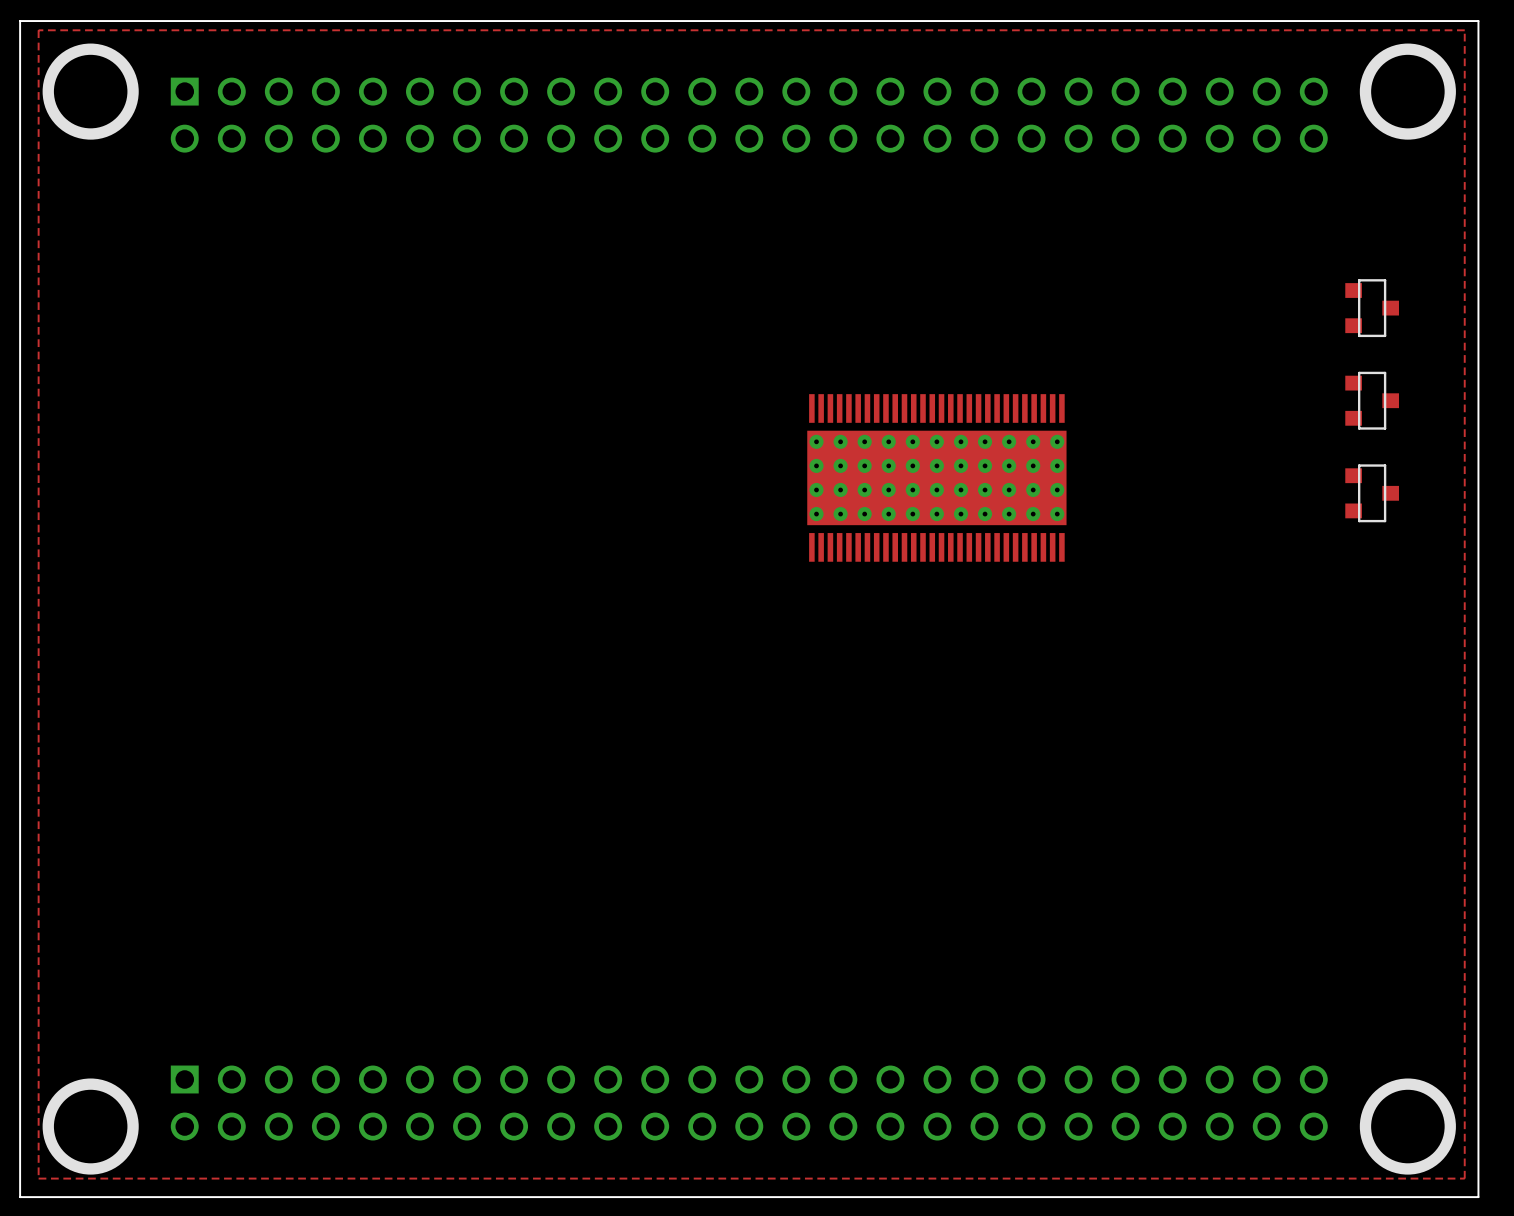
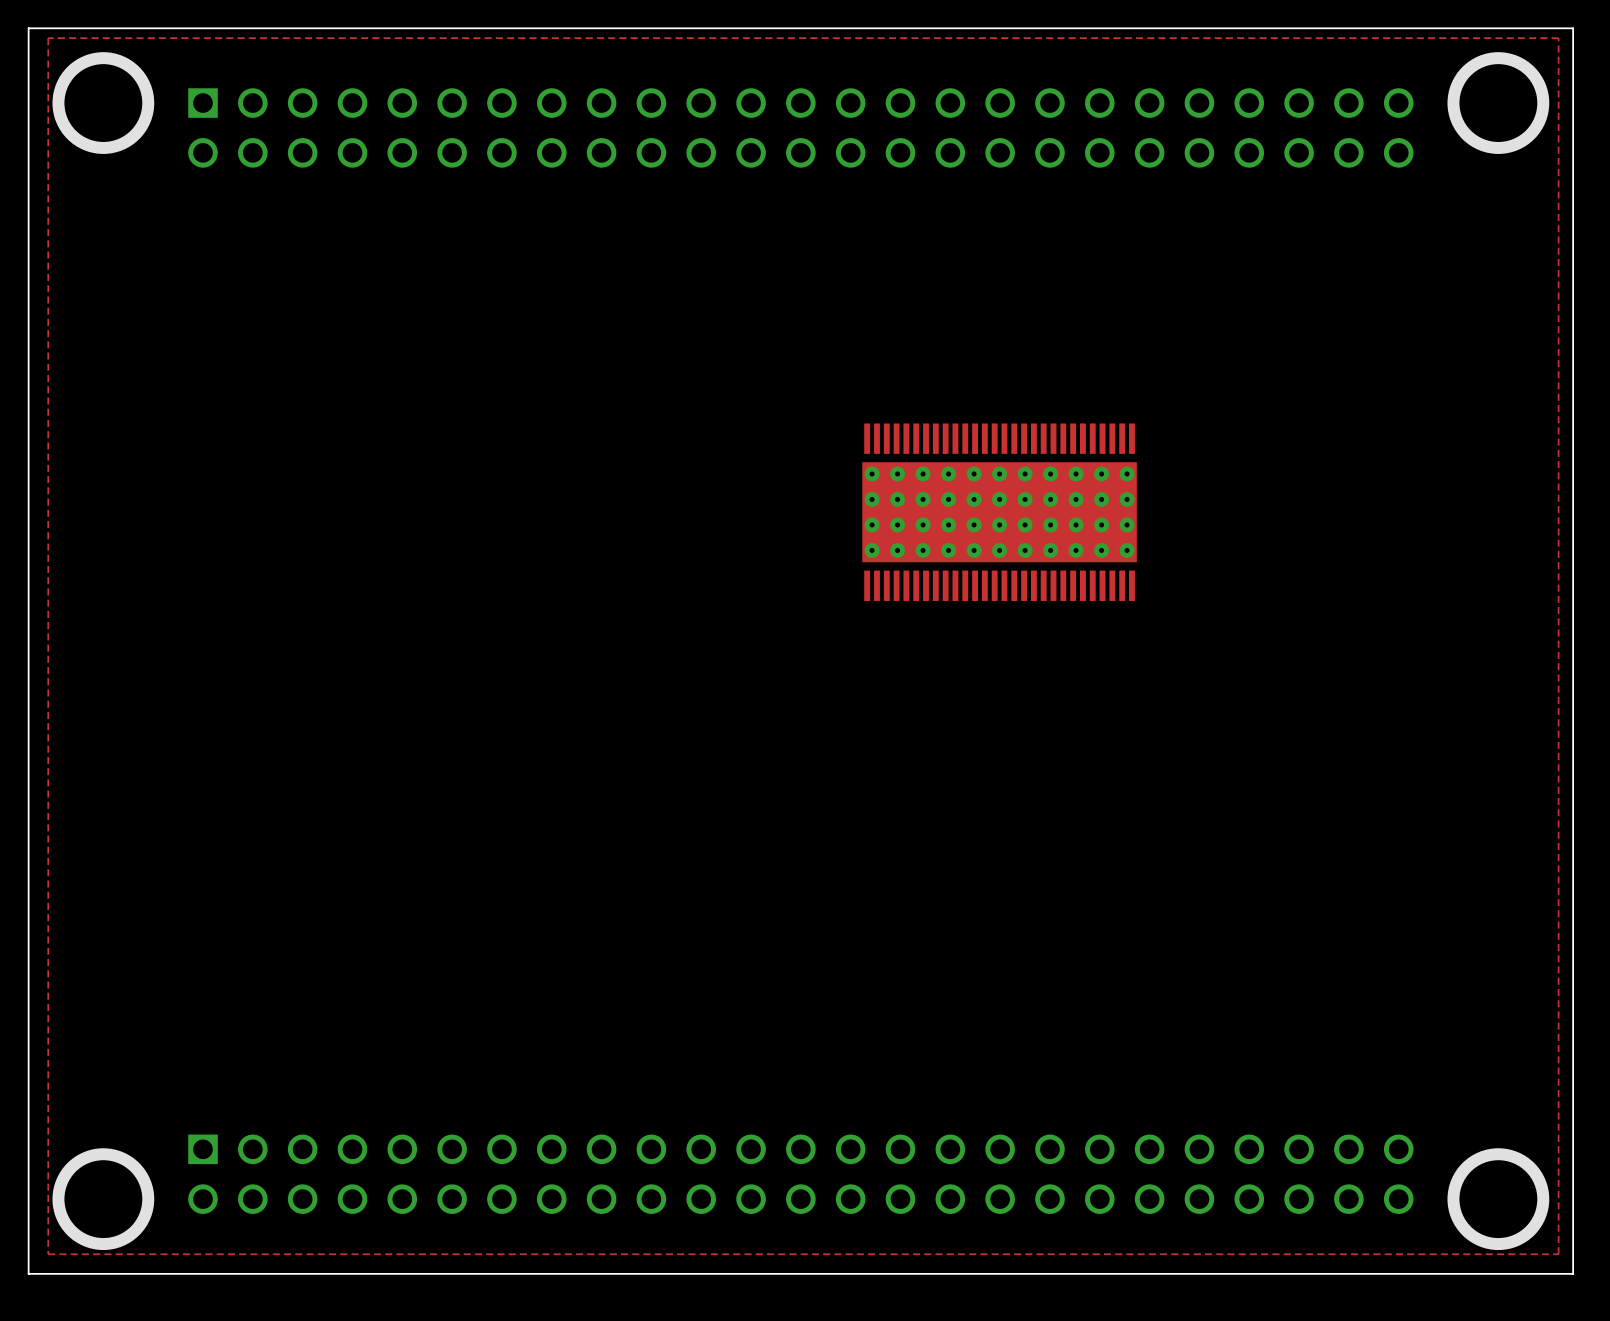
part: (1372, 308) -> none
part: (1372, 400) -> none
part: (1372, 493) -> none

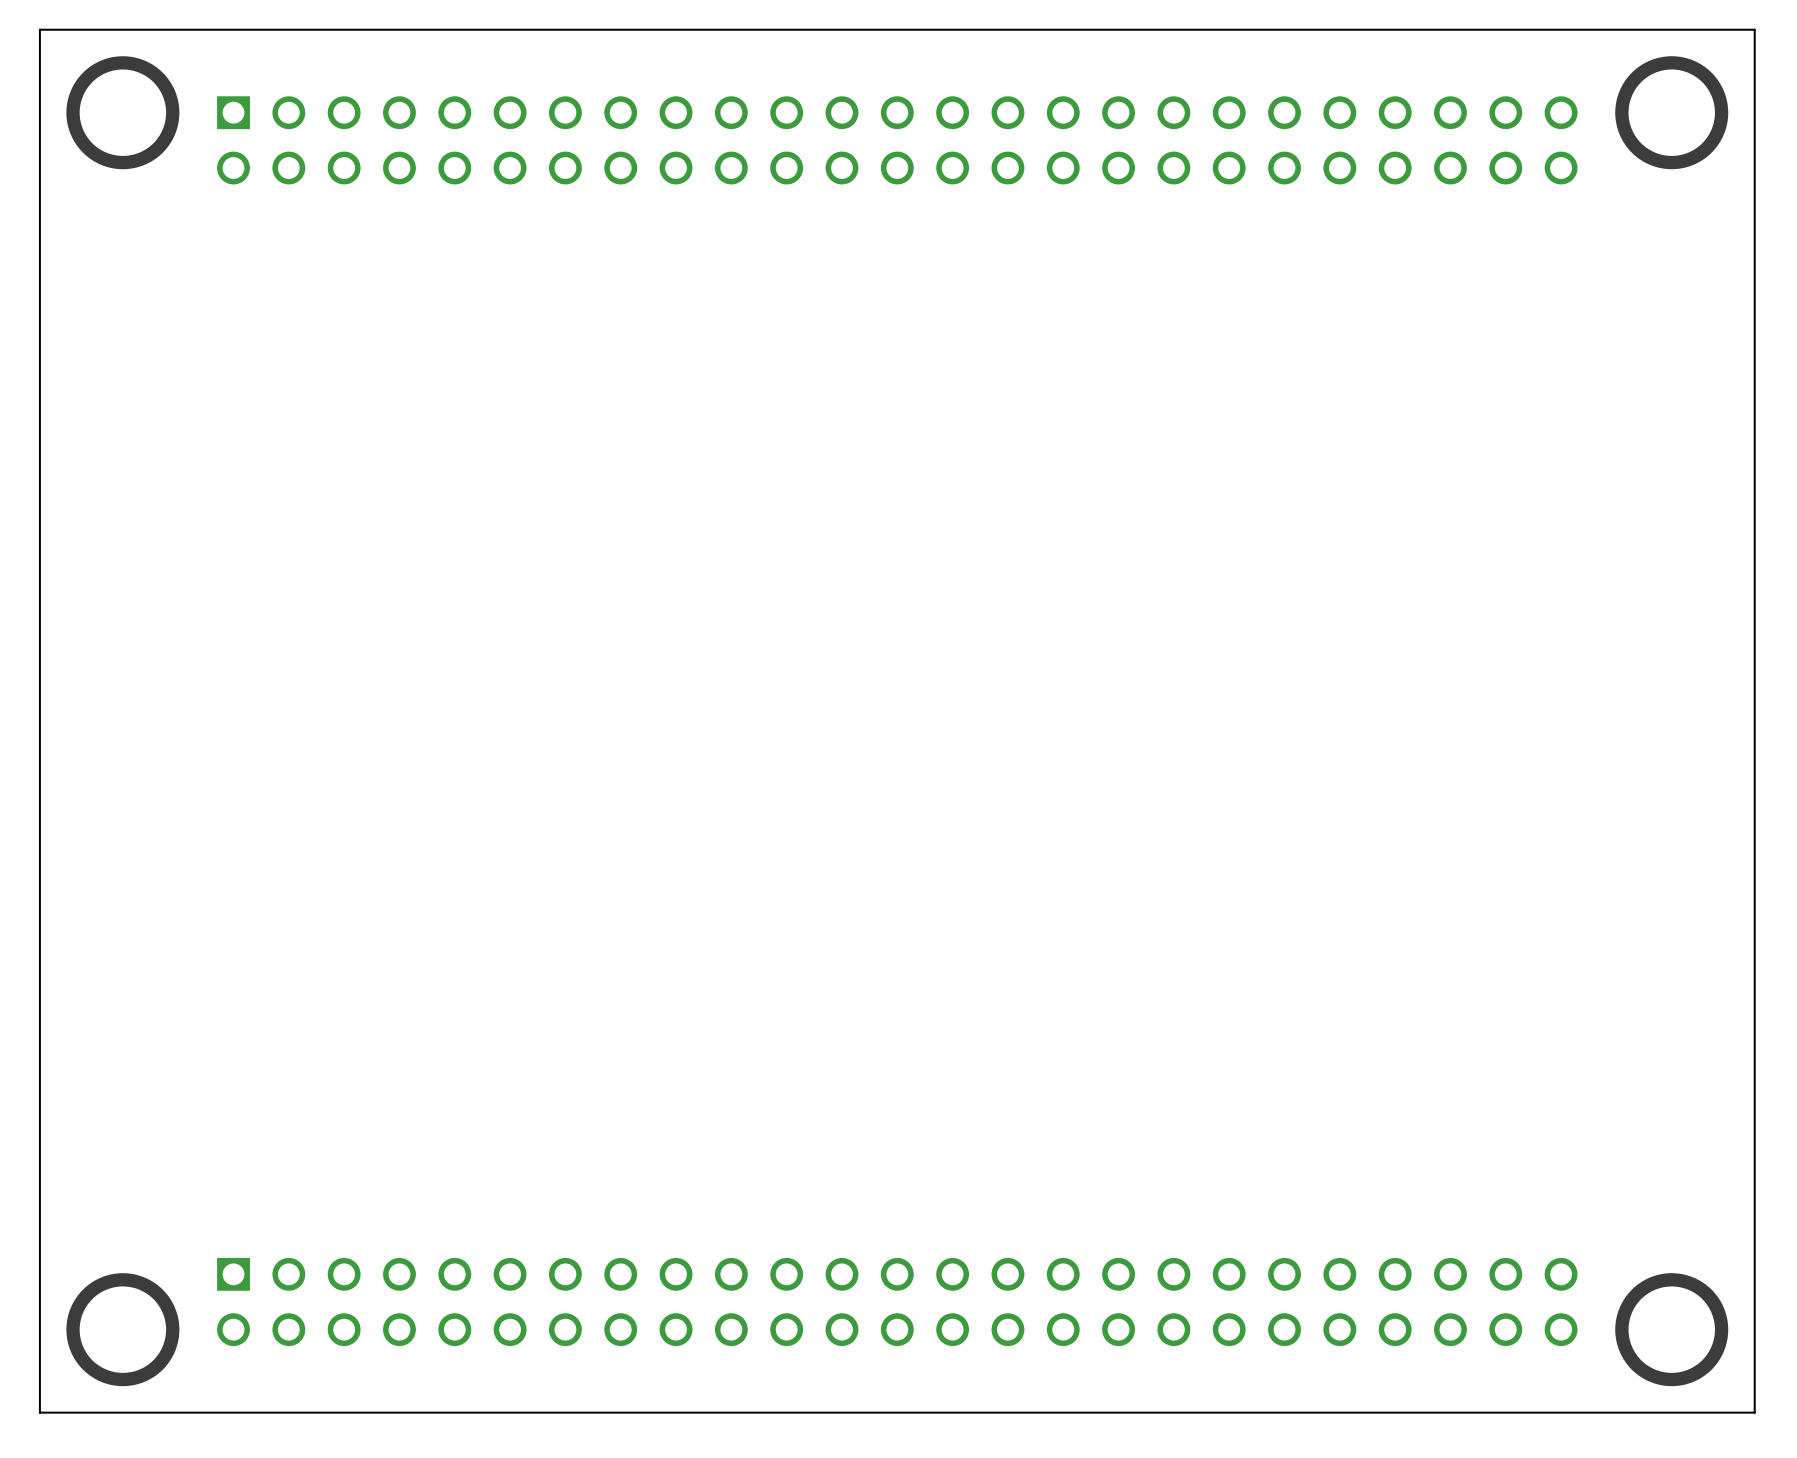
zone outline: (48, 38) (1558, 38) (1558, 1254) (48, 1254) (48, 38) -> none
part: (999, 512) -> none

